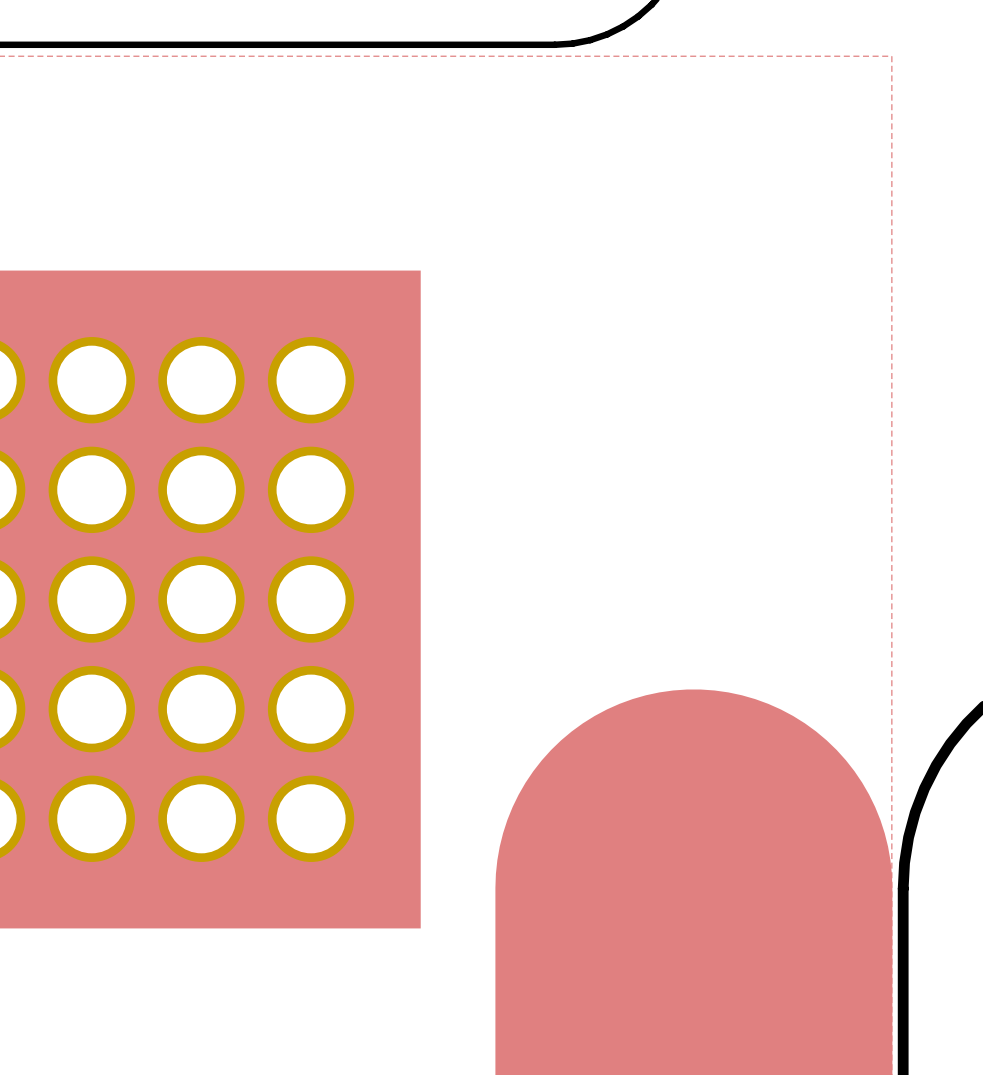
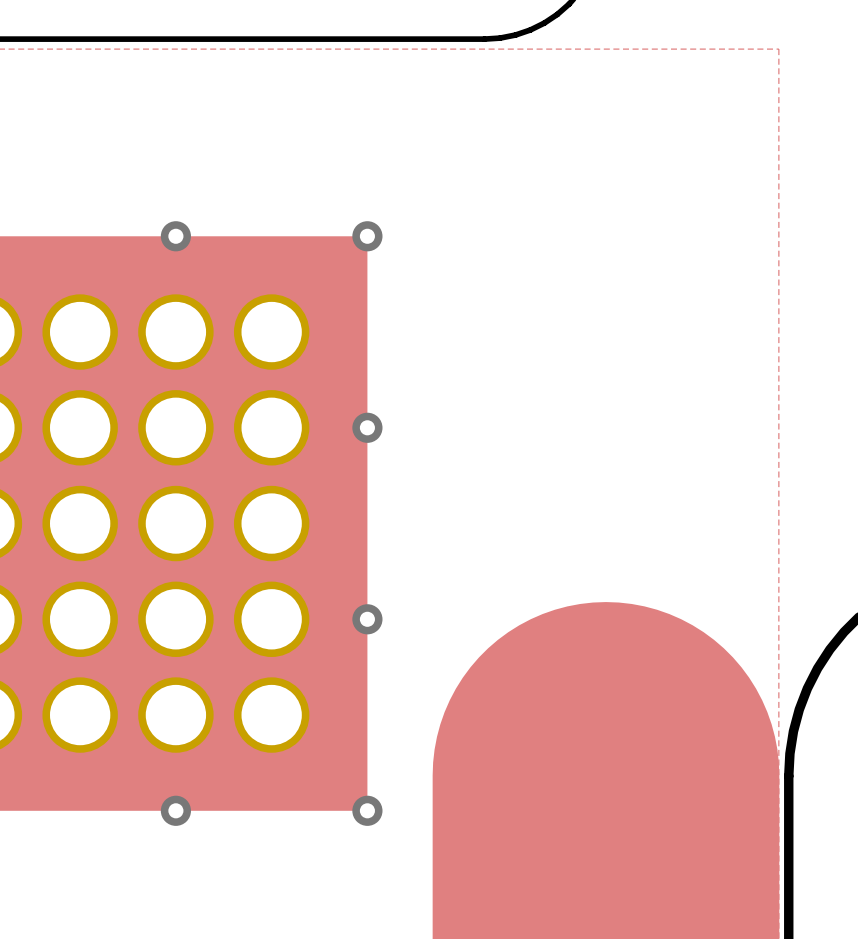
via: none -> (175, 236)
via: none -> (367, 236)
via: none -> (367, 427)
via: none -> (367, 619)
via: none -> (175, 810)
via: none -> (367, 810)

